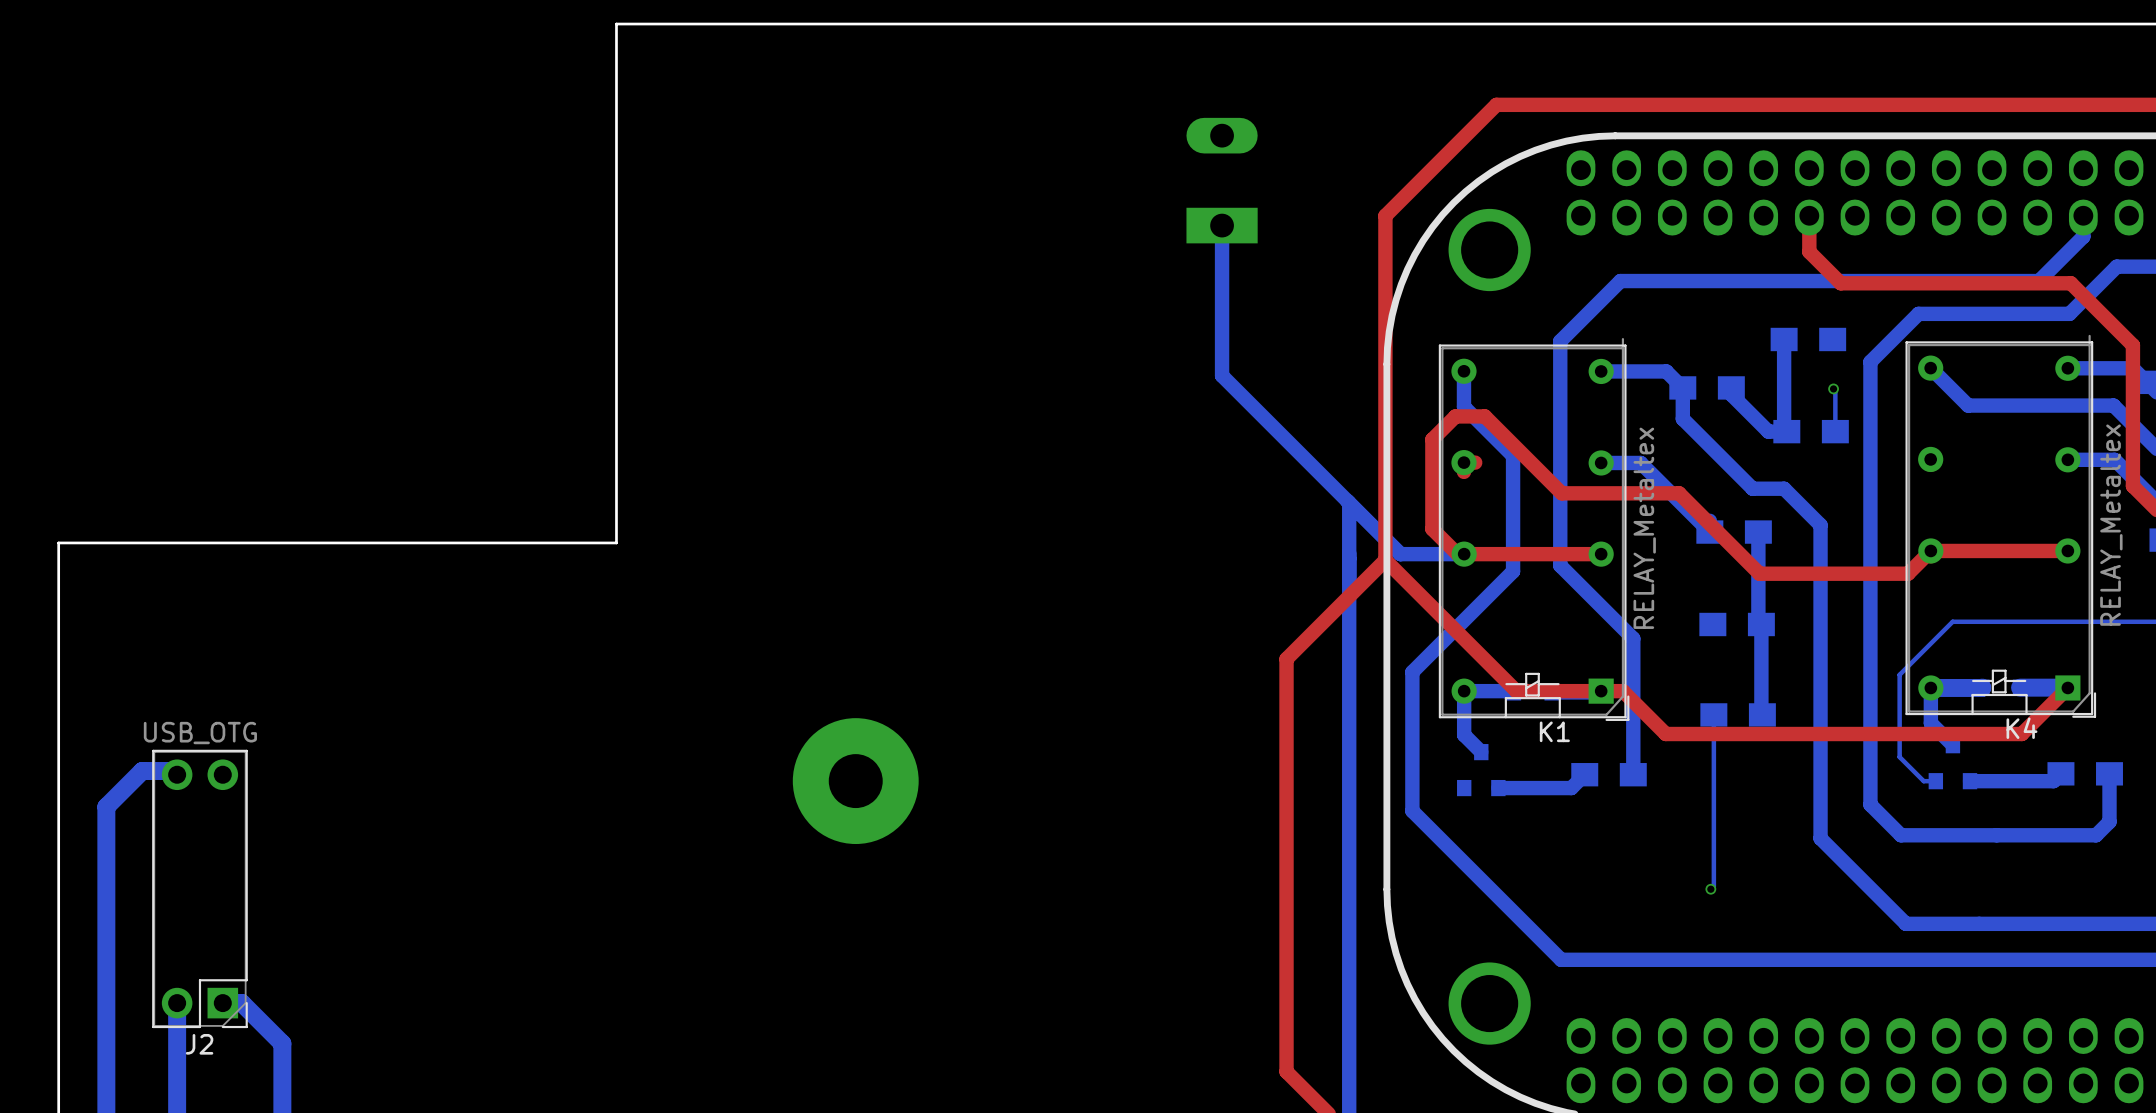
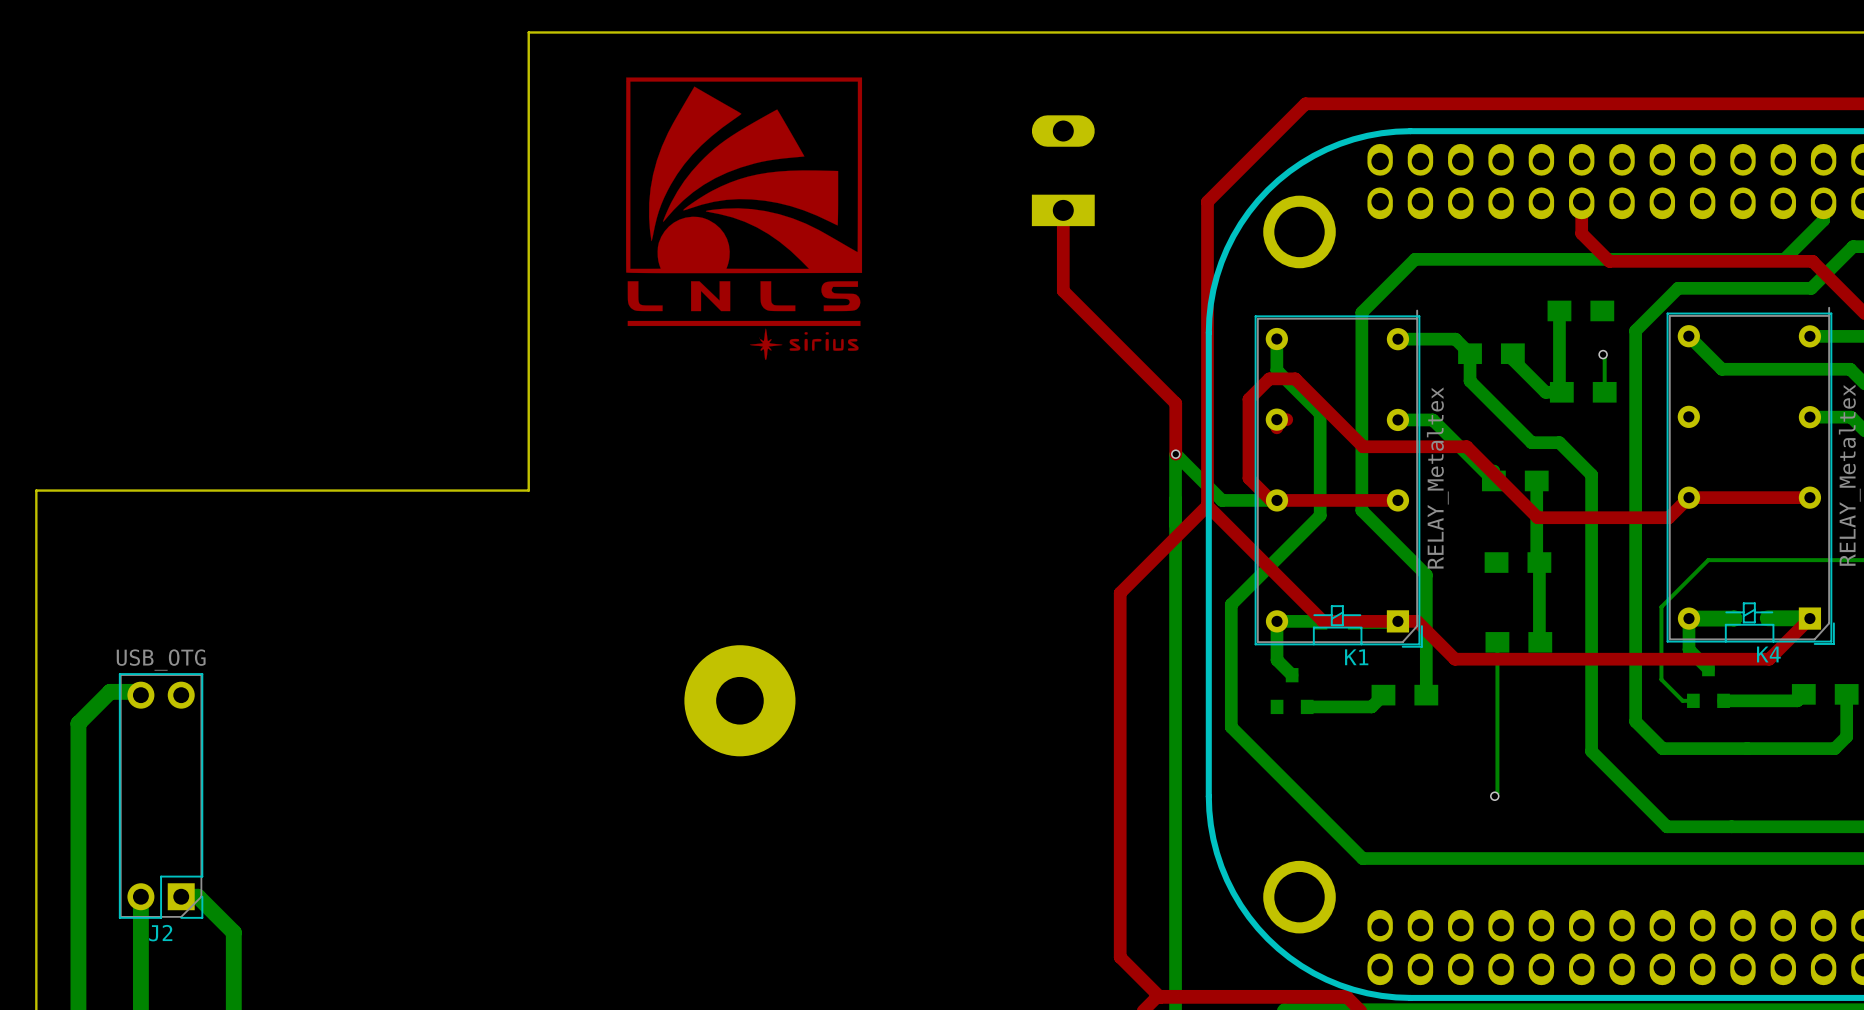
drawing: none -> [626, 77, 863, 361]
top track: none -> (1063, 210) (1063, 290) (1175, 403) (1175, 454)
bottom track: (1222, 225) (1222, 375) (1401, 554) -> (1175, 454) (1221, 500)
via: none -> (1175, 454)

